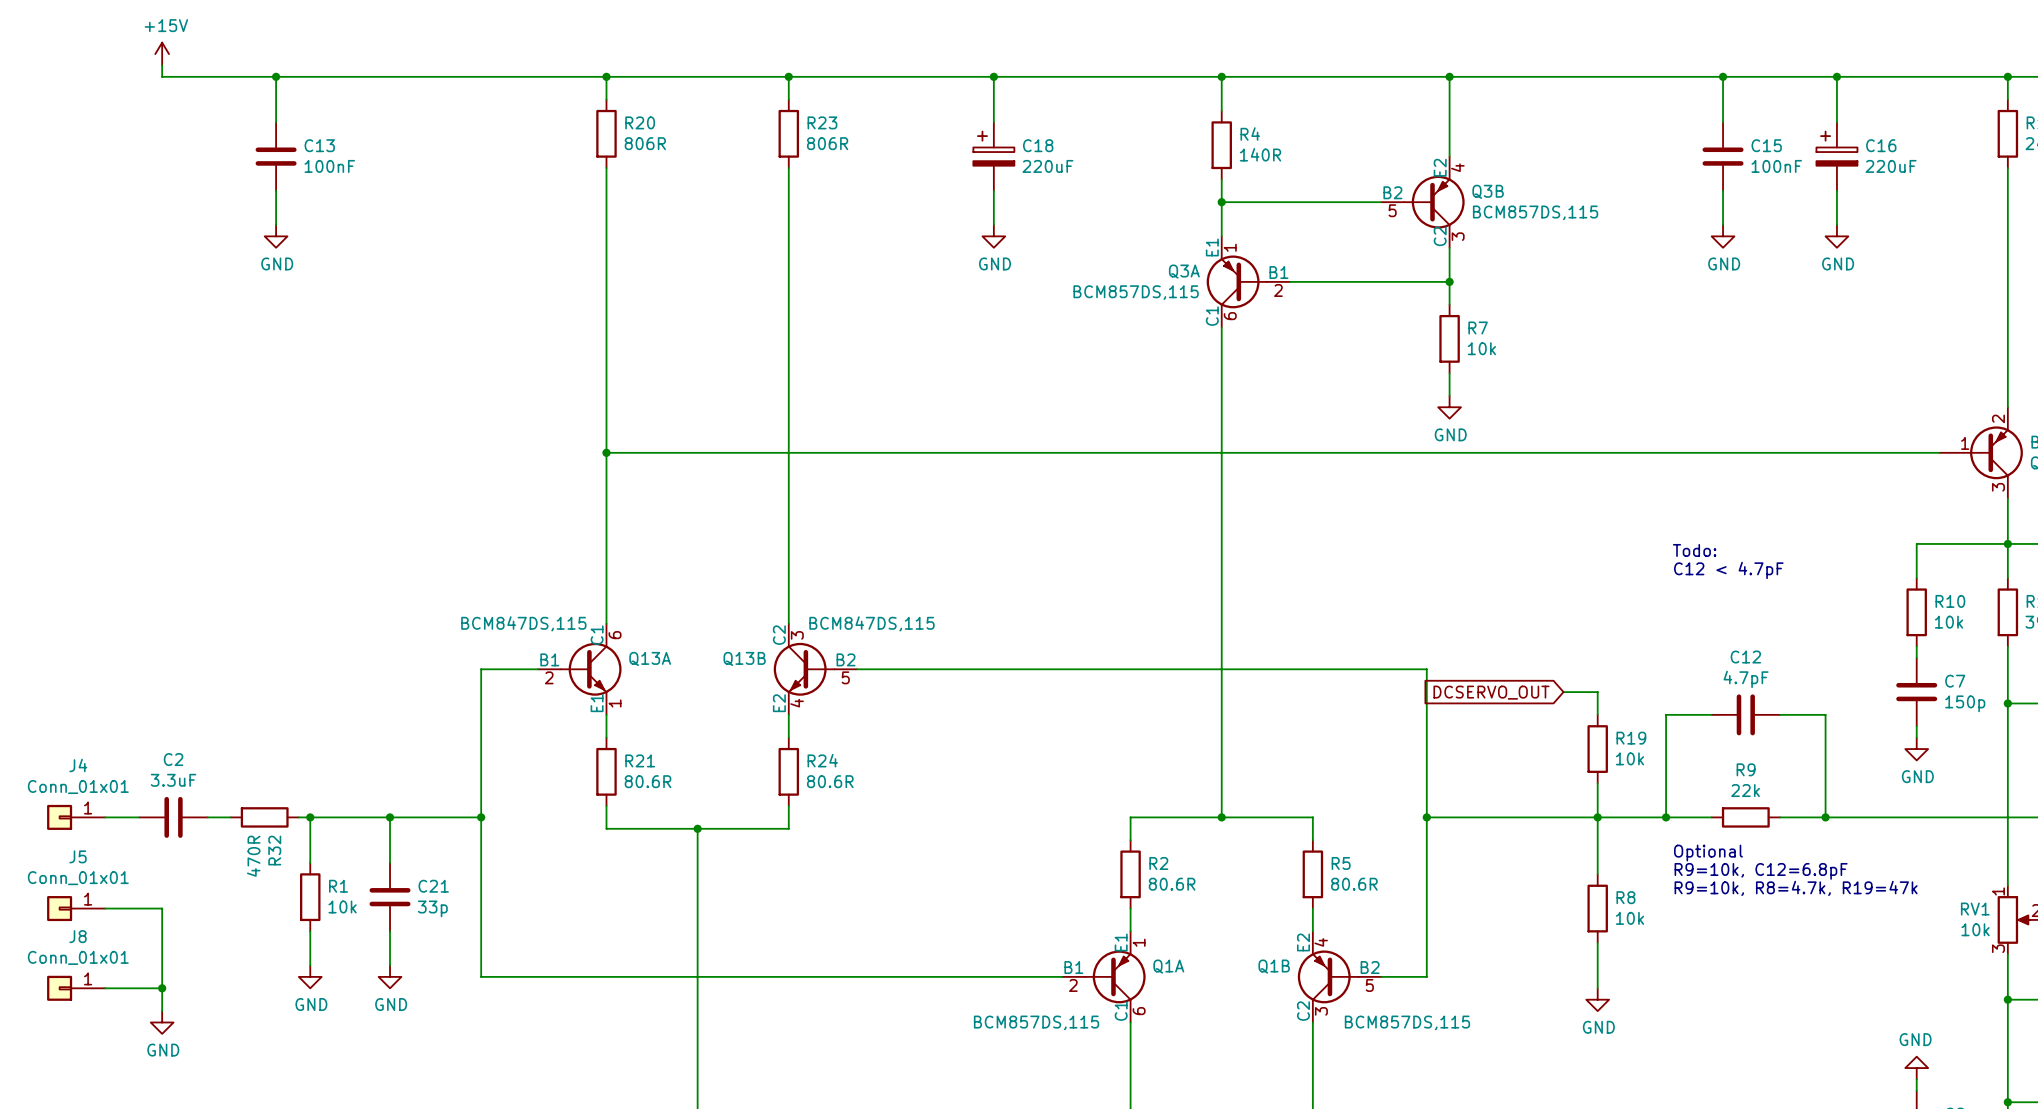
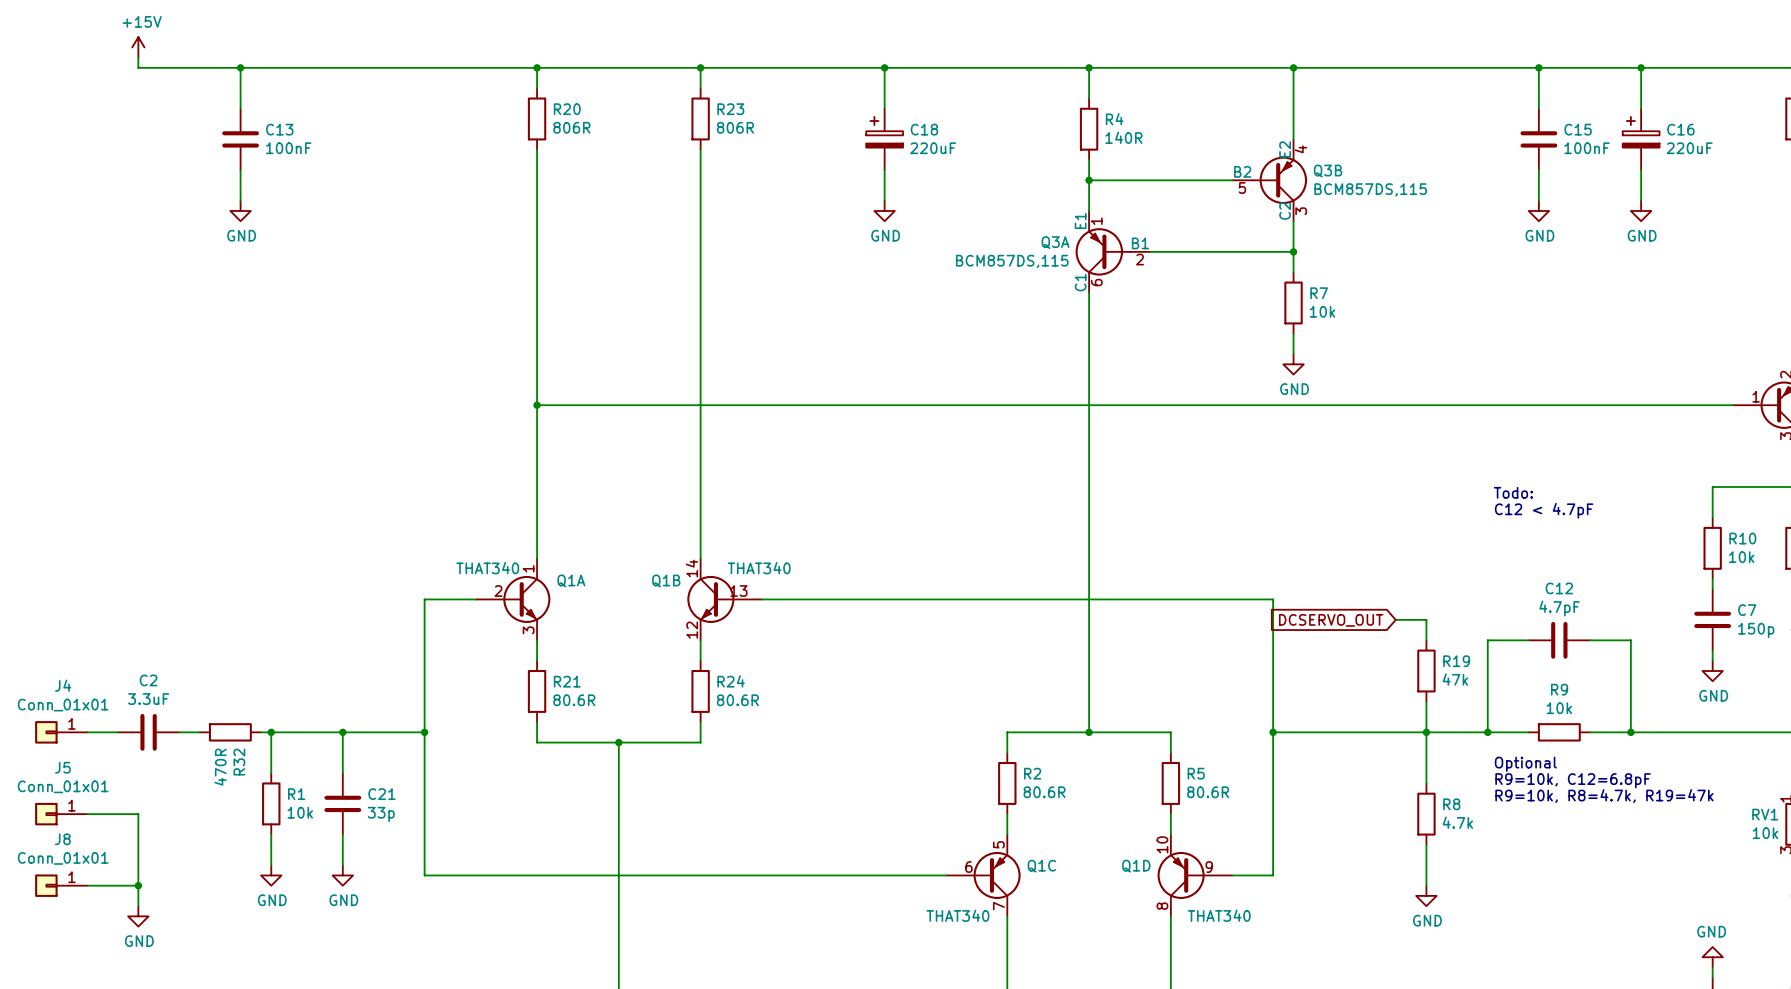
Q13A: BCM847DS,115 (579, 669) -> none
Q13B: BCM847DS,115 (815, 669) -> none
R19 value: 10k (1630, 758) -> 47k (1455, 679)
R9 value: 22k (1745, 790) -> 10k (1559, 708)
R8 value: 10k (1630, 918) -> 4.7k (1457, 822)
Q1A symbol: [1062, 931, 1146, 1023] -> [475, 558, 551, 641]
Q1B symbol: [1297, 931, 1382, 1023] -> [687, 558, 762, 641]
Q1C: none -> THAT340 (983, 875)
Q1D: none -> THAT340 (1194, 875)
Q1A value: BCM857DS,115 (1036, 1022) -> THAT340 (487, 568)
Q1B value: BCM857DS,115 (1407, 1022) -> THAT340 (759, 568)

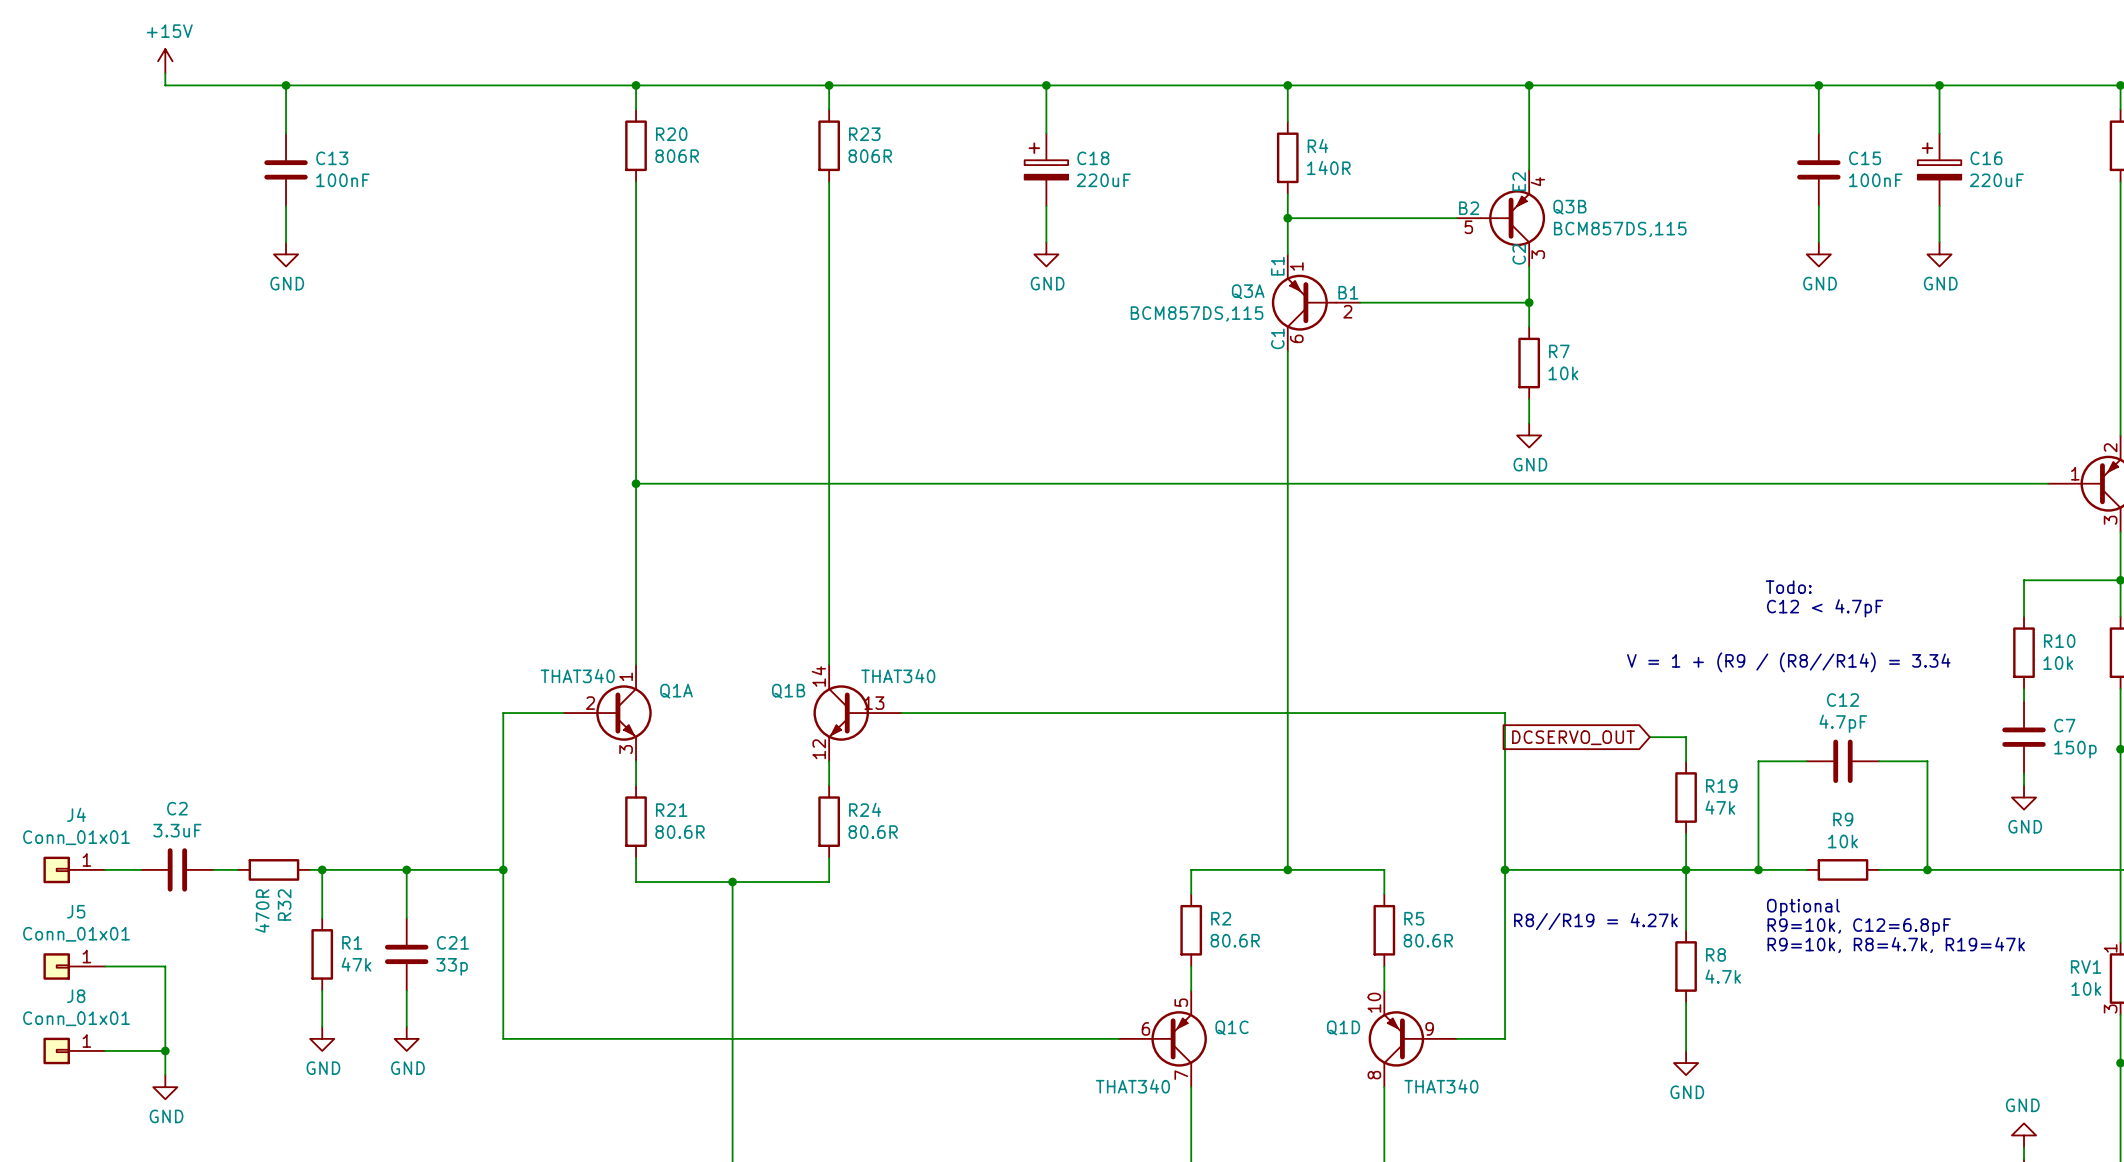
text: none -> V = 1 + (R9 / (R8//R14) = 3.34 (1788, 662)
text: none -> R8//R19 = 4.27k (1595, 921)
R1 value: 10k (300, 812) -> 47k (356, 964)

